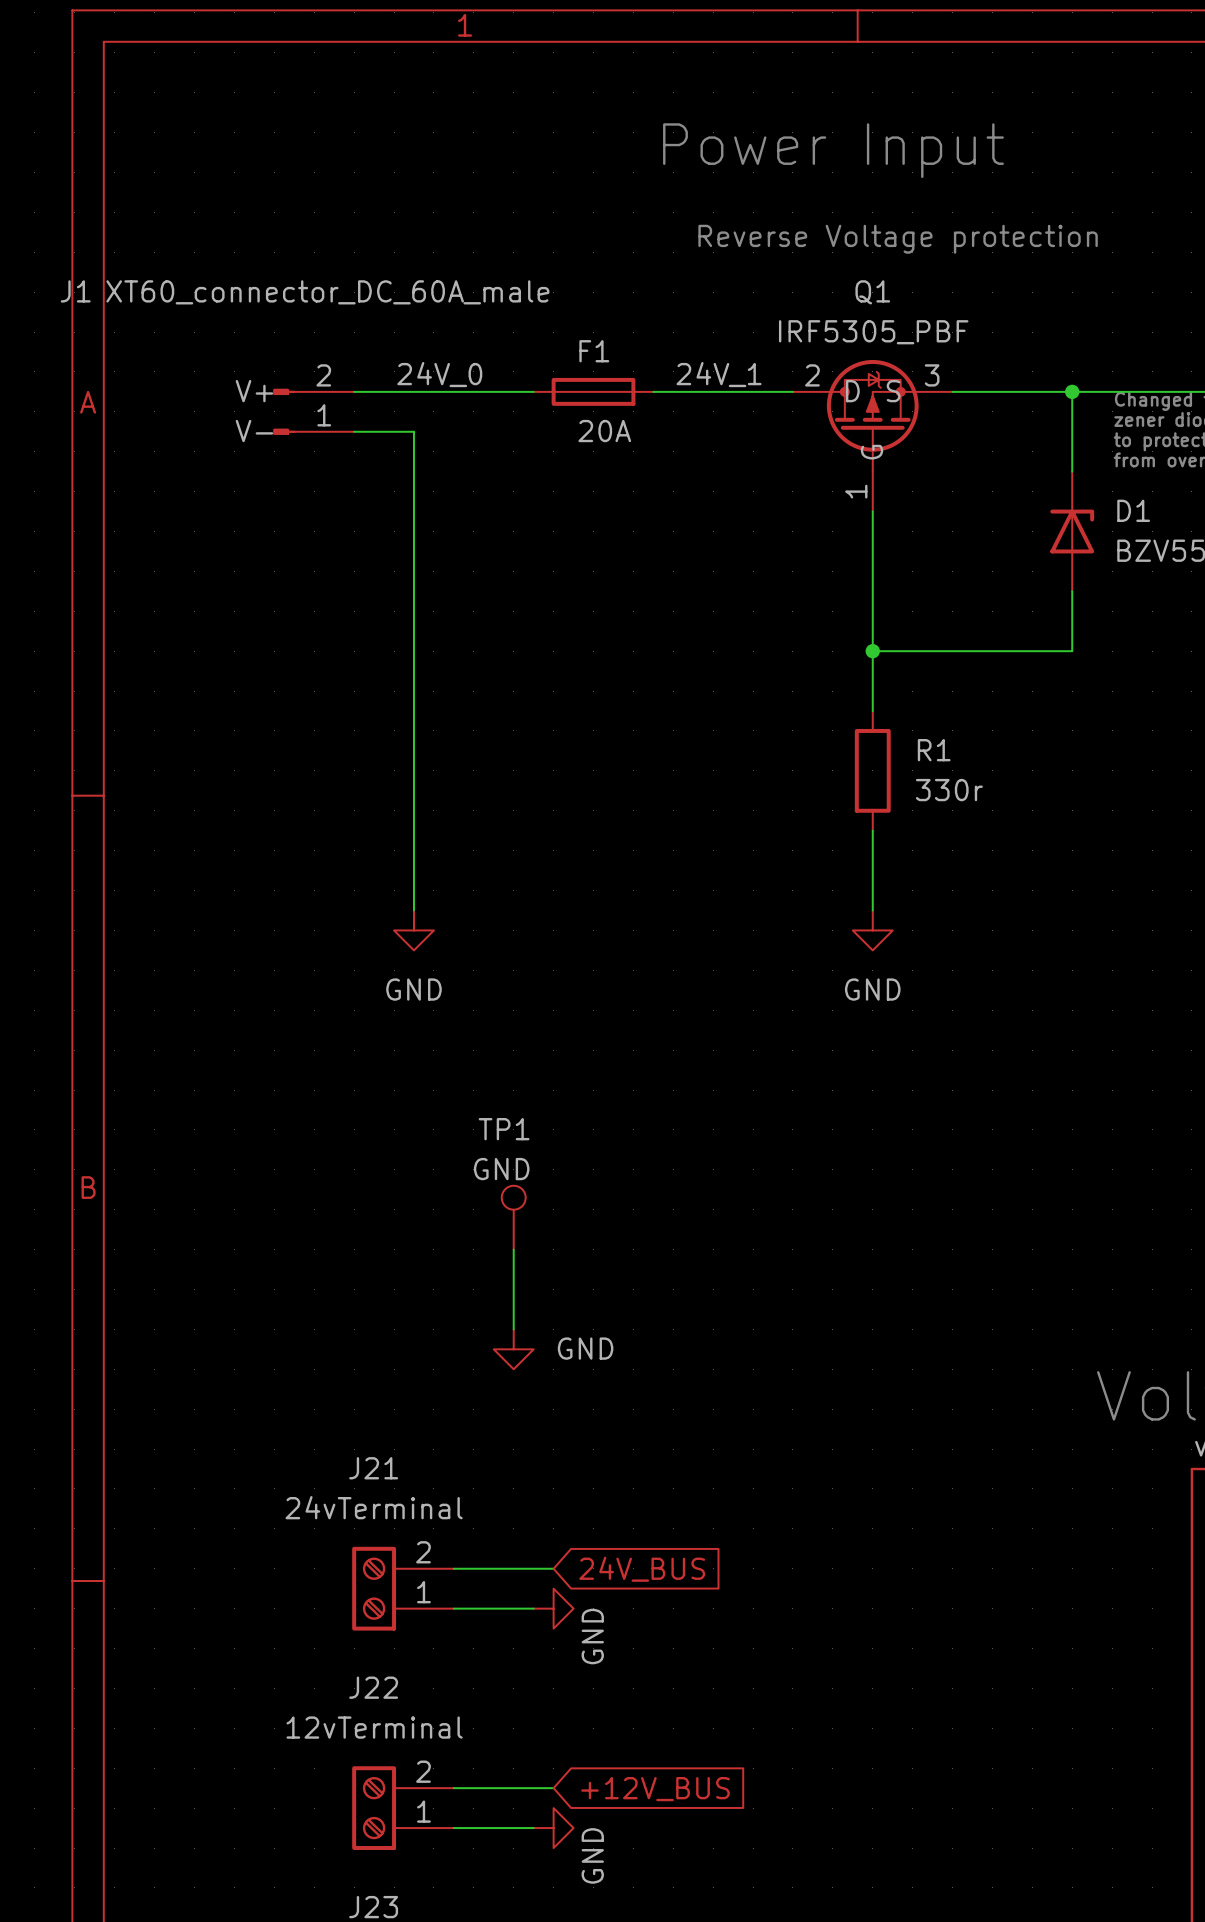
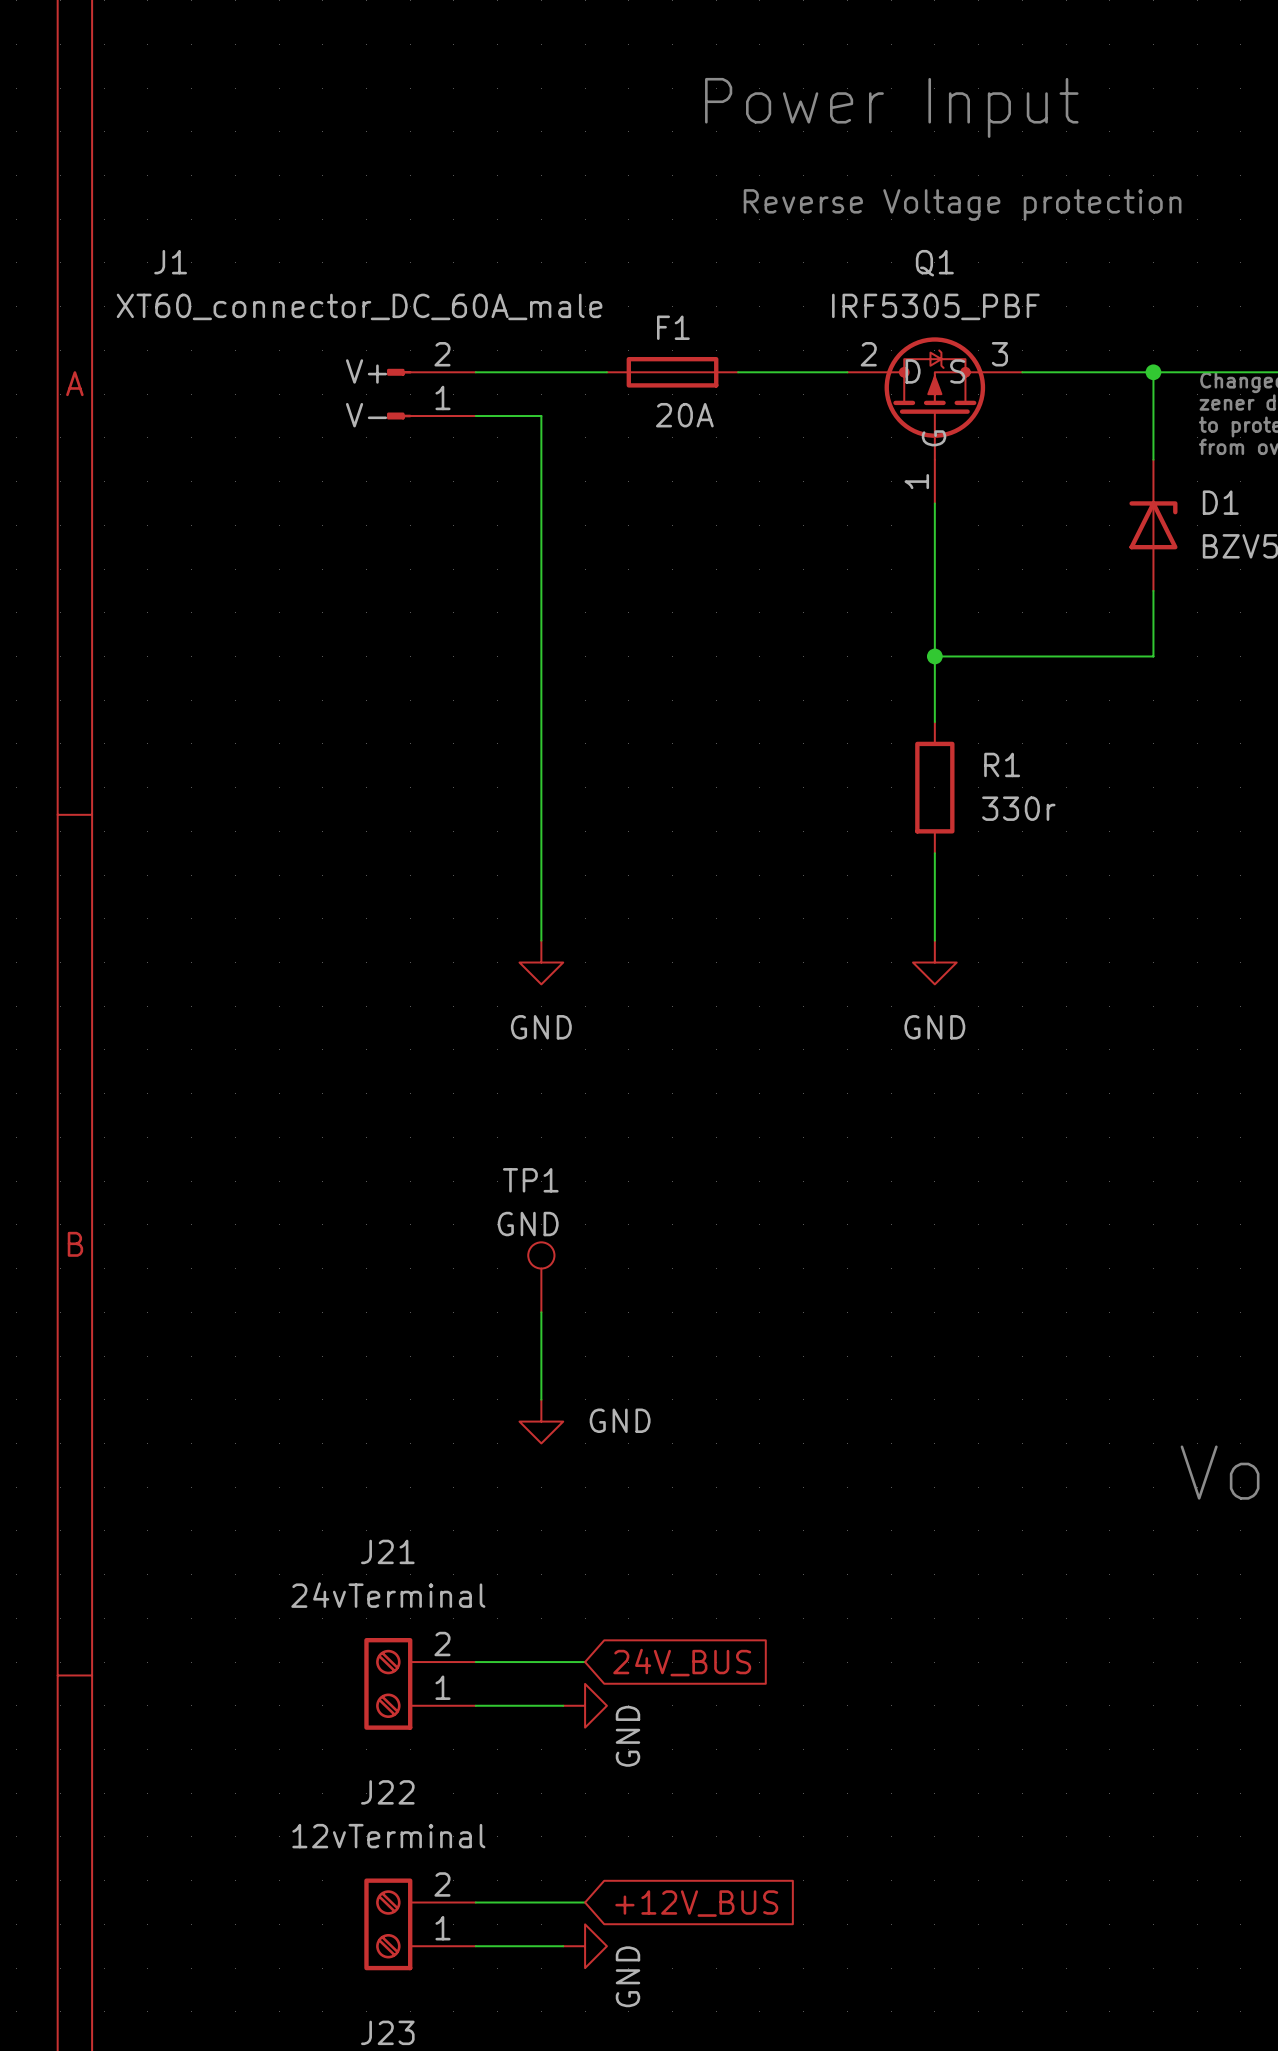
J1 value position: XT60_connector_DC_60A_male (327, 292) -> XT60_connector_DC_60A_male (359, 306)
label: 24V_0 (439, 374) -> none
label: 24V_1 (719, 374) -> none
F1 position: (593, 391) -> (672, 372)
J1 position: (313, 411) -> (431, 394)
wire: (354, 431) (413, 431) (413, 910) -> (475, 416) (541, 416) (541, 940)
power symbol position: GND (413, 930) -> GND (541, 962)

